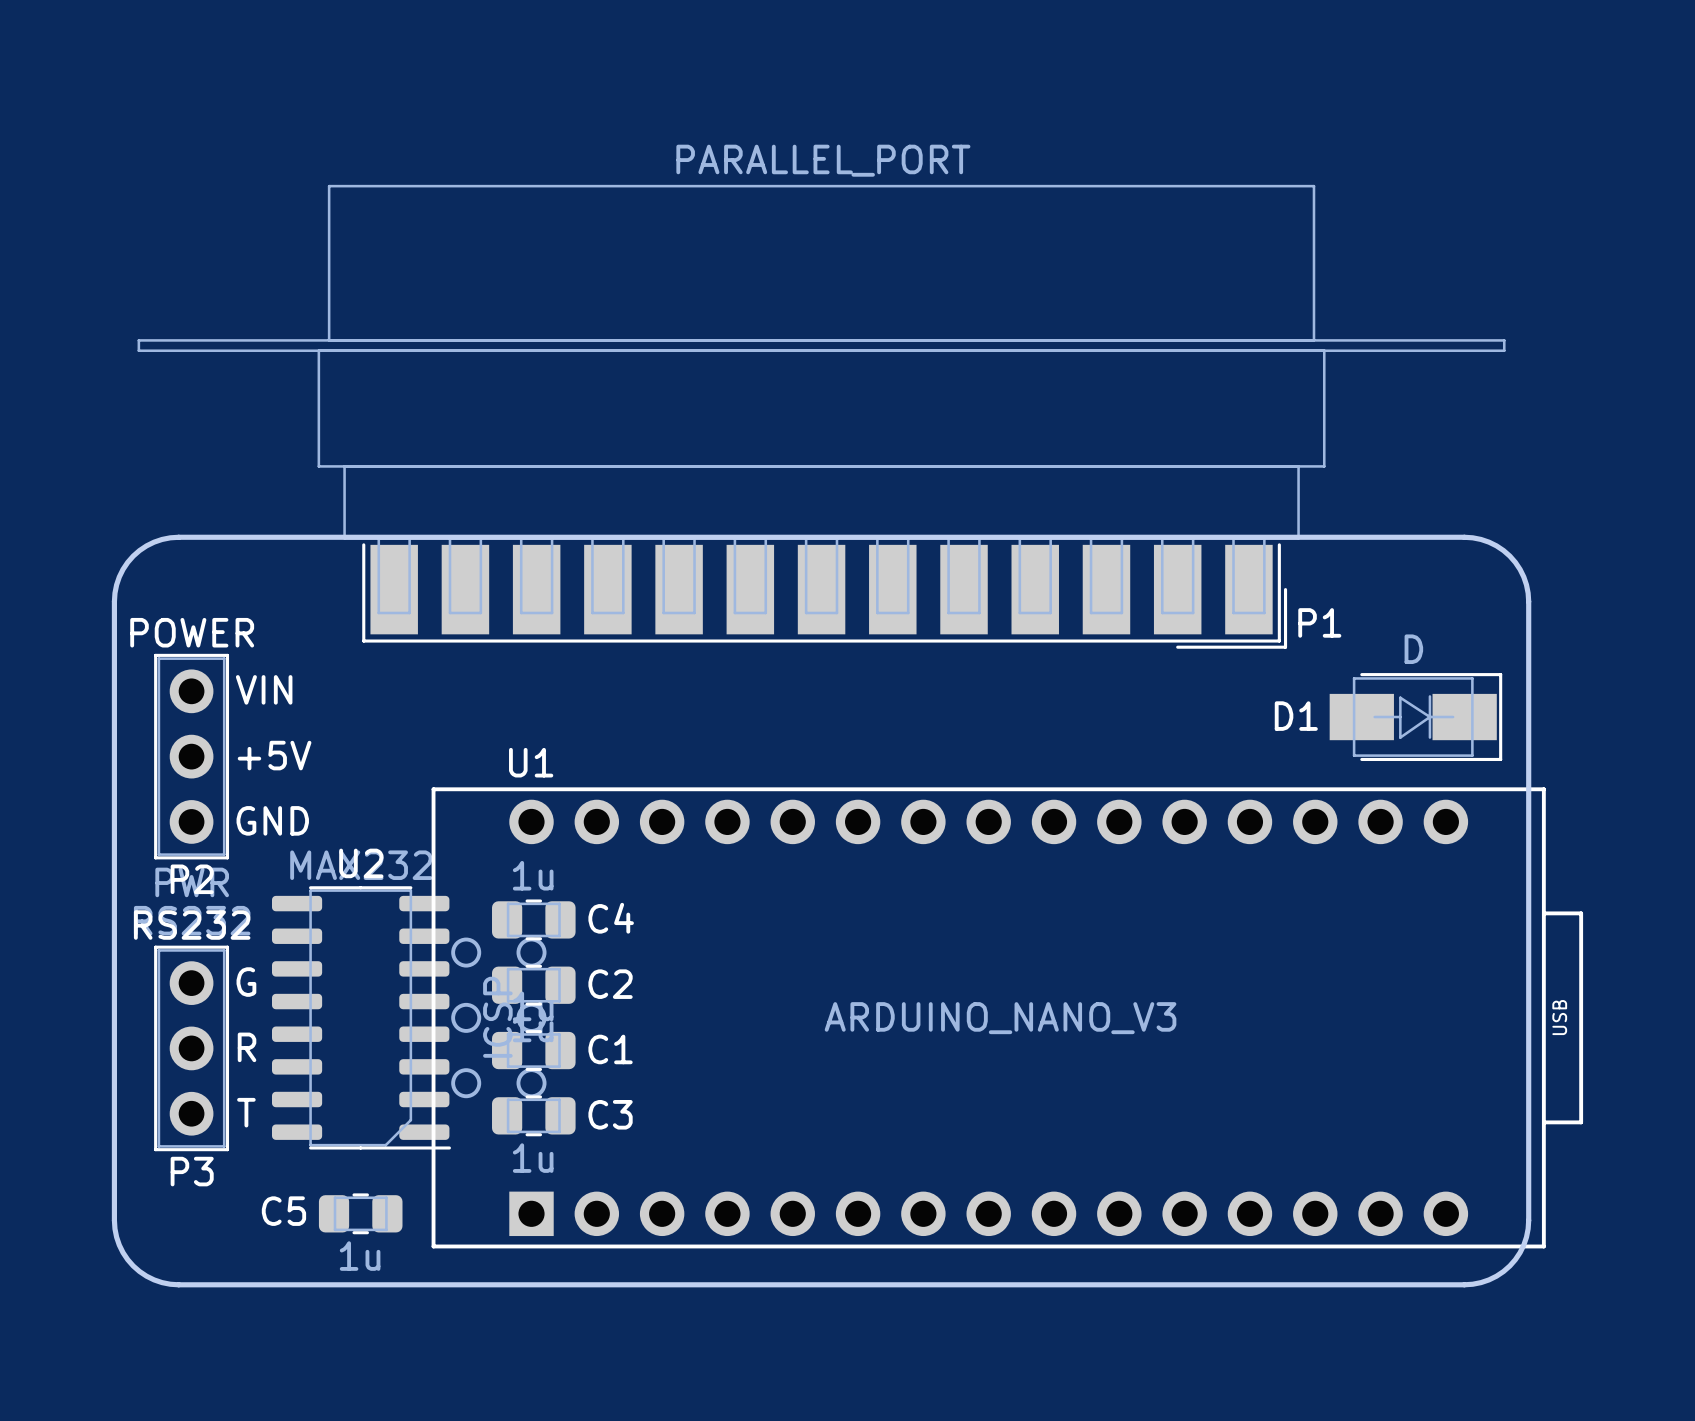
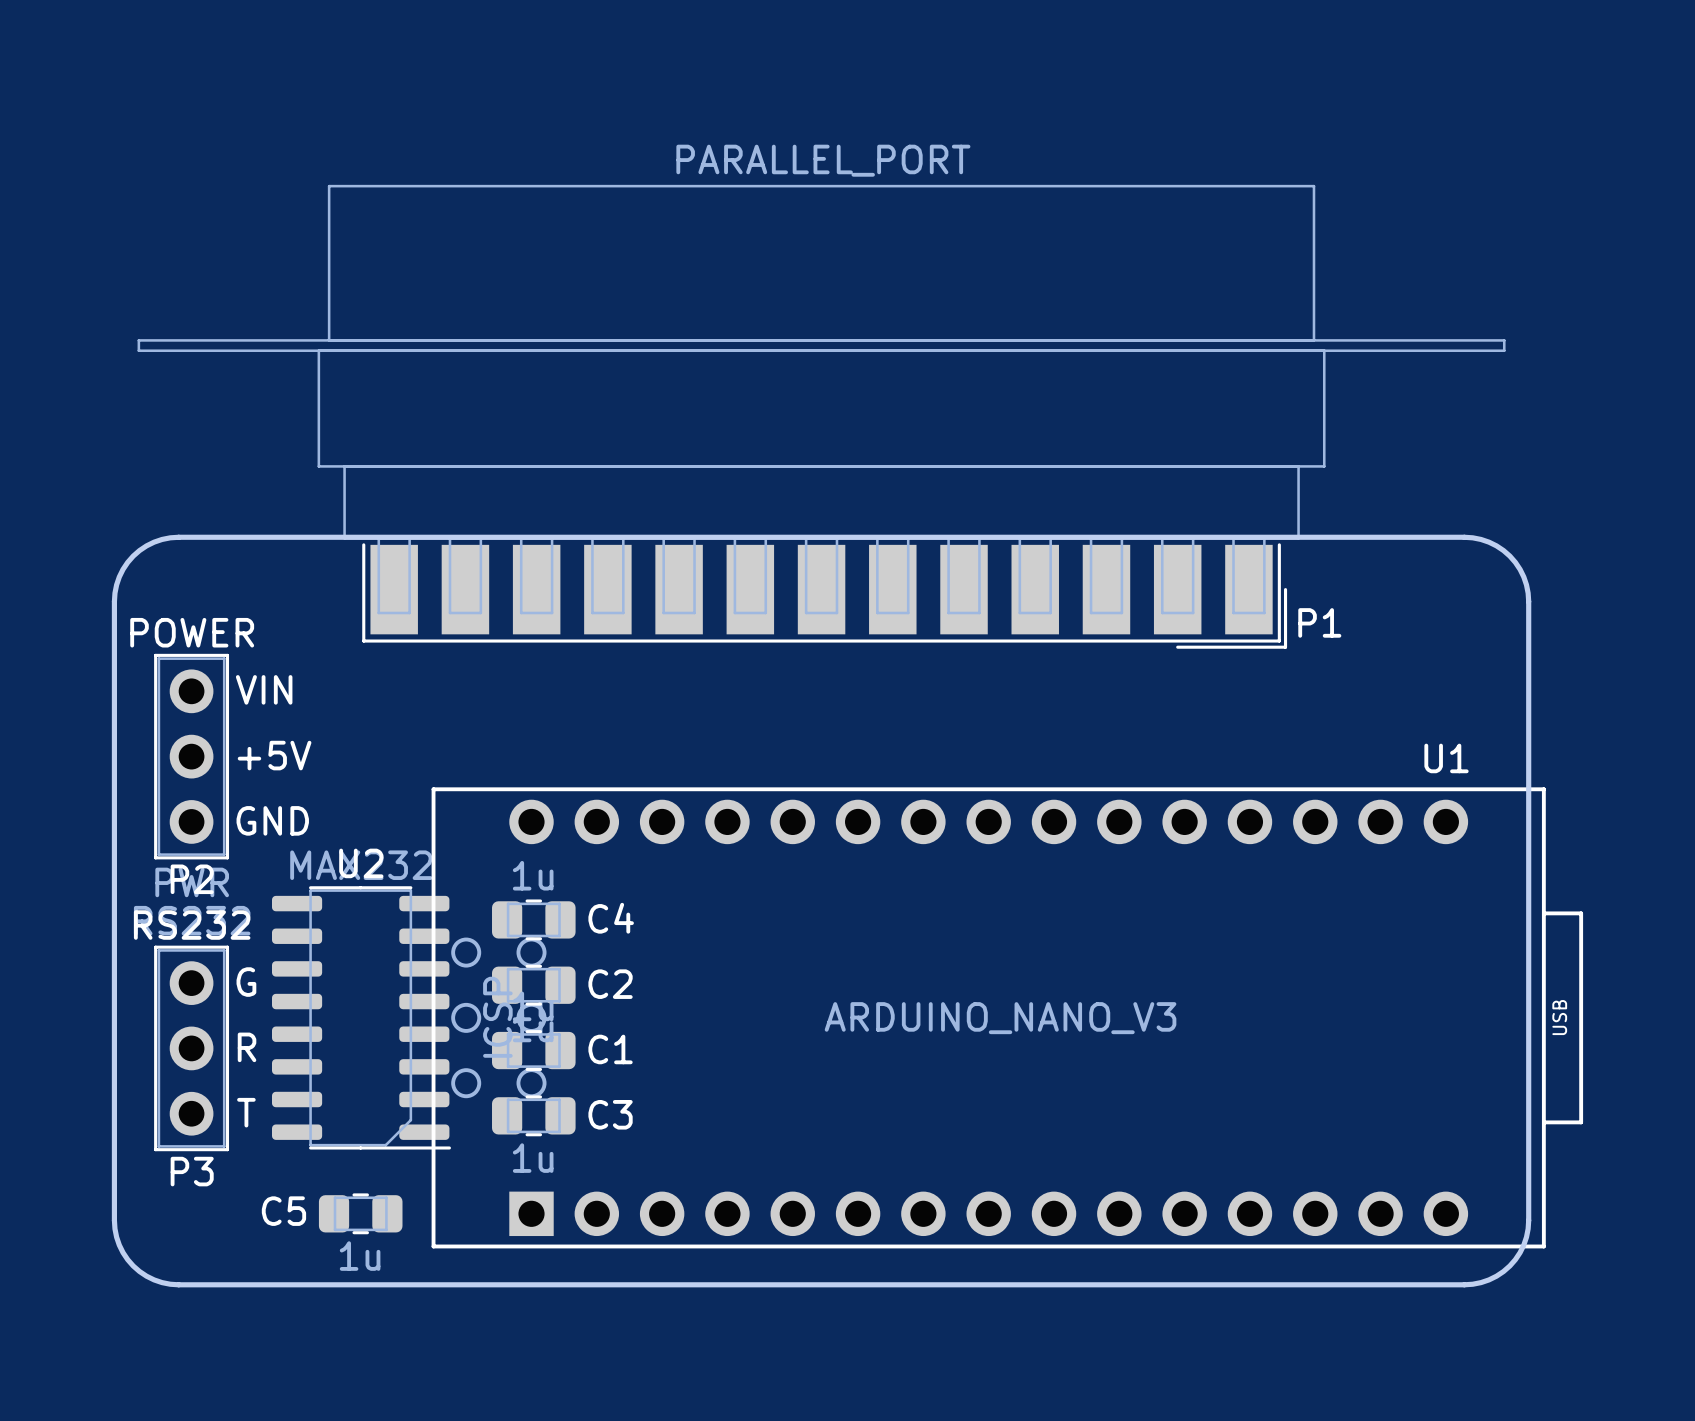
D1: D (1415, 717) -> none
U1 name position: U1 (531, 762) -> U1 (1446, 758)

